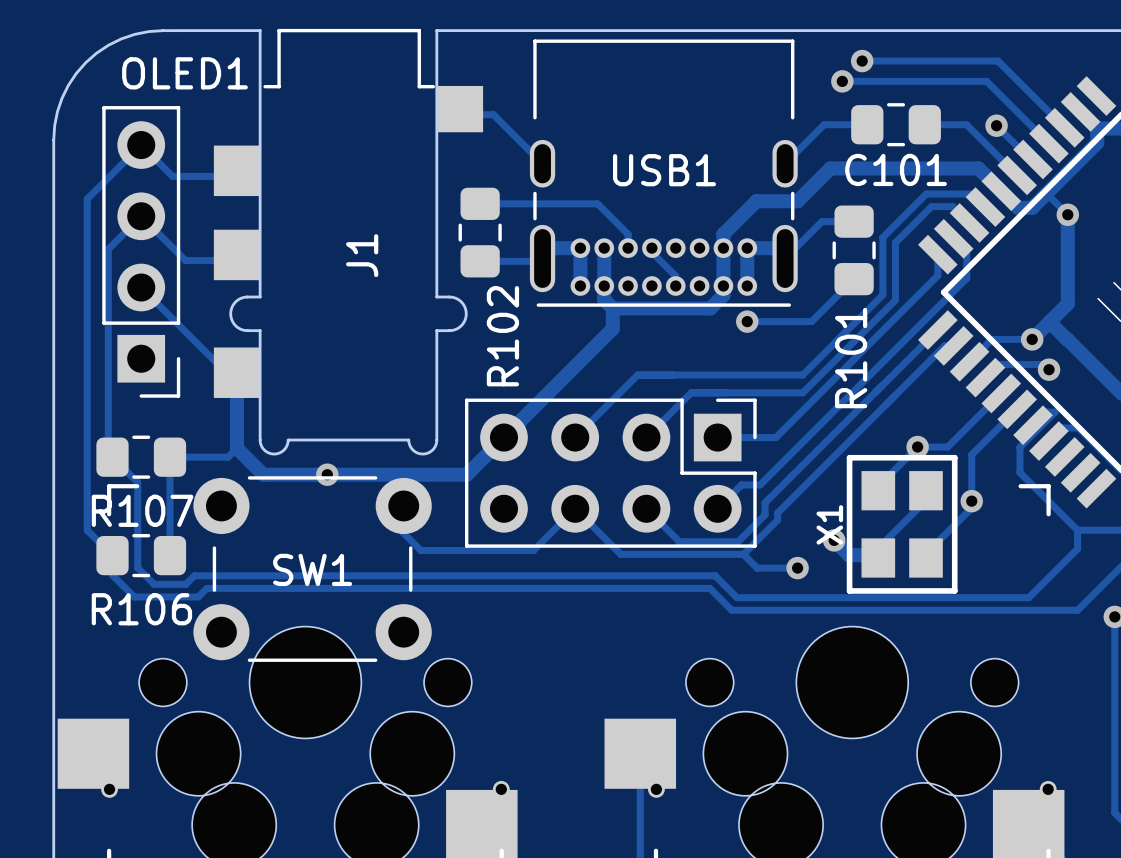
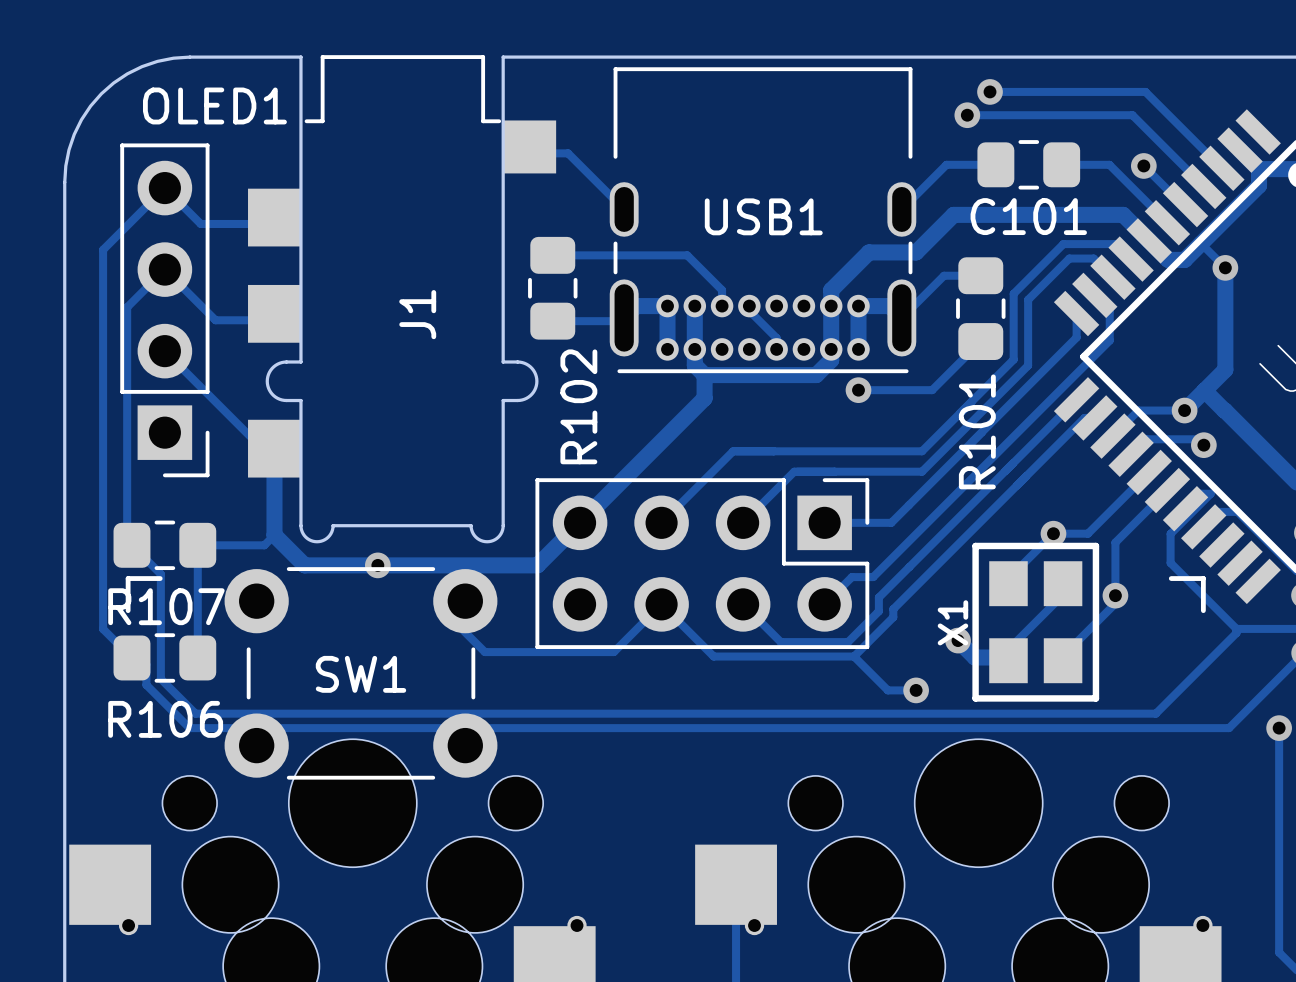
track: (1077, 533) (1077, 548) (1028, 597) (737, 597) (715, 575) (194, 575) (185, 584) (154, 584) (137, 567) -> (1236, 633) (1155, 713) (195, 713) (160, 679) (160, 672)
track: (112, 555) (112, 575) (134, 596) (198, 596) (206, 588) (709, 588) (731, 610) (1077, 610) -> (131, 657) (139, 657) (146, 664) (146, 684) (189, 728) (1229, 728) (1236, 720)
track: (757, 568) (797, 568) -> (869, 672) (887, 690) (916, 690)
via position: (797, 568) -> (916, 690)

